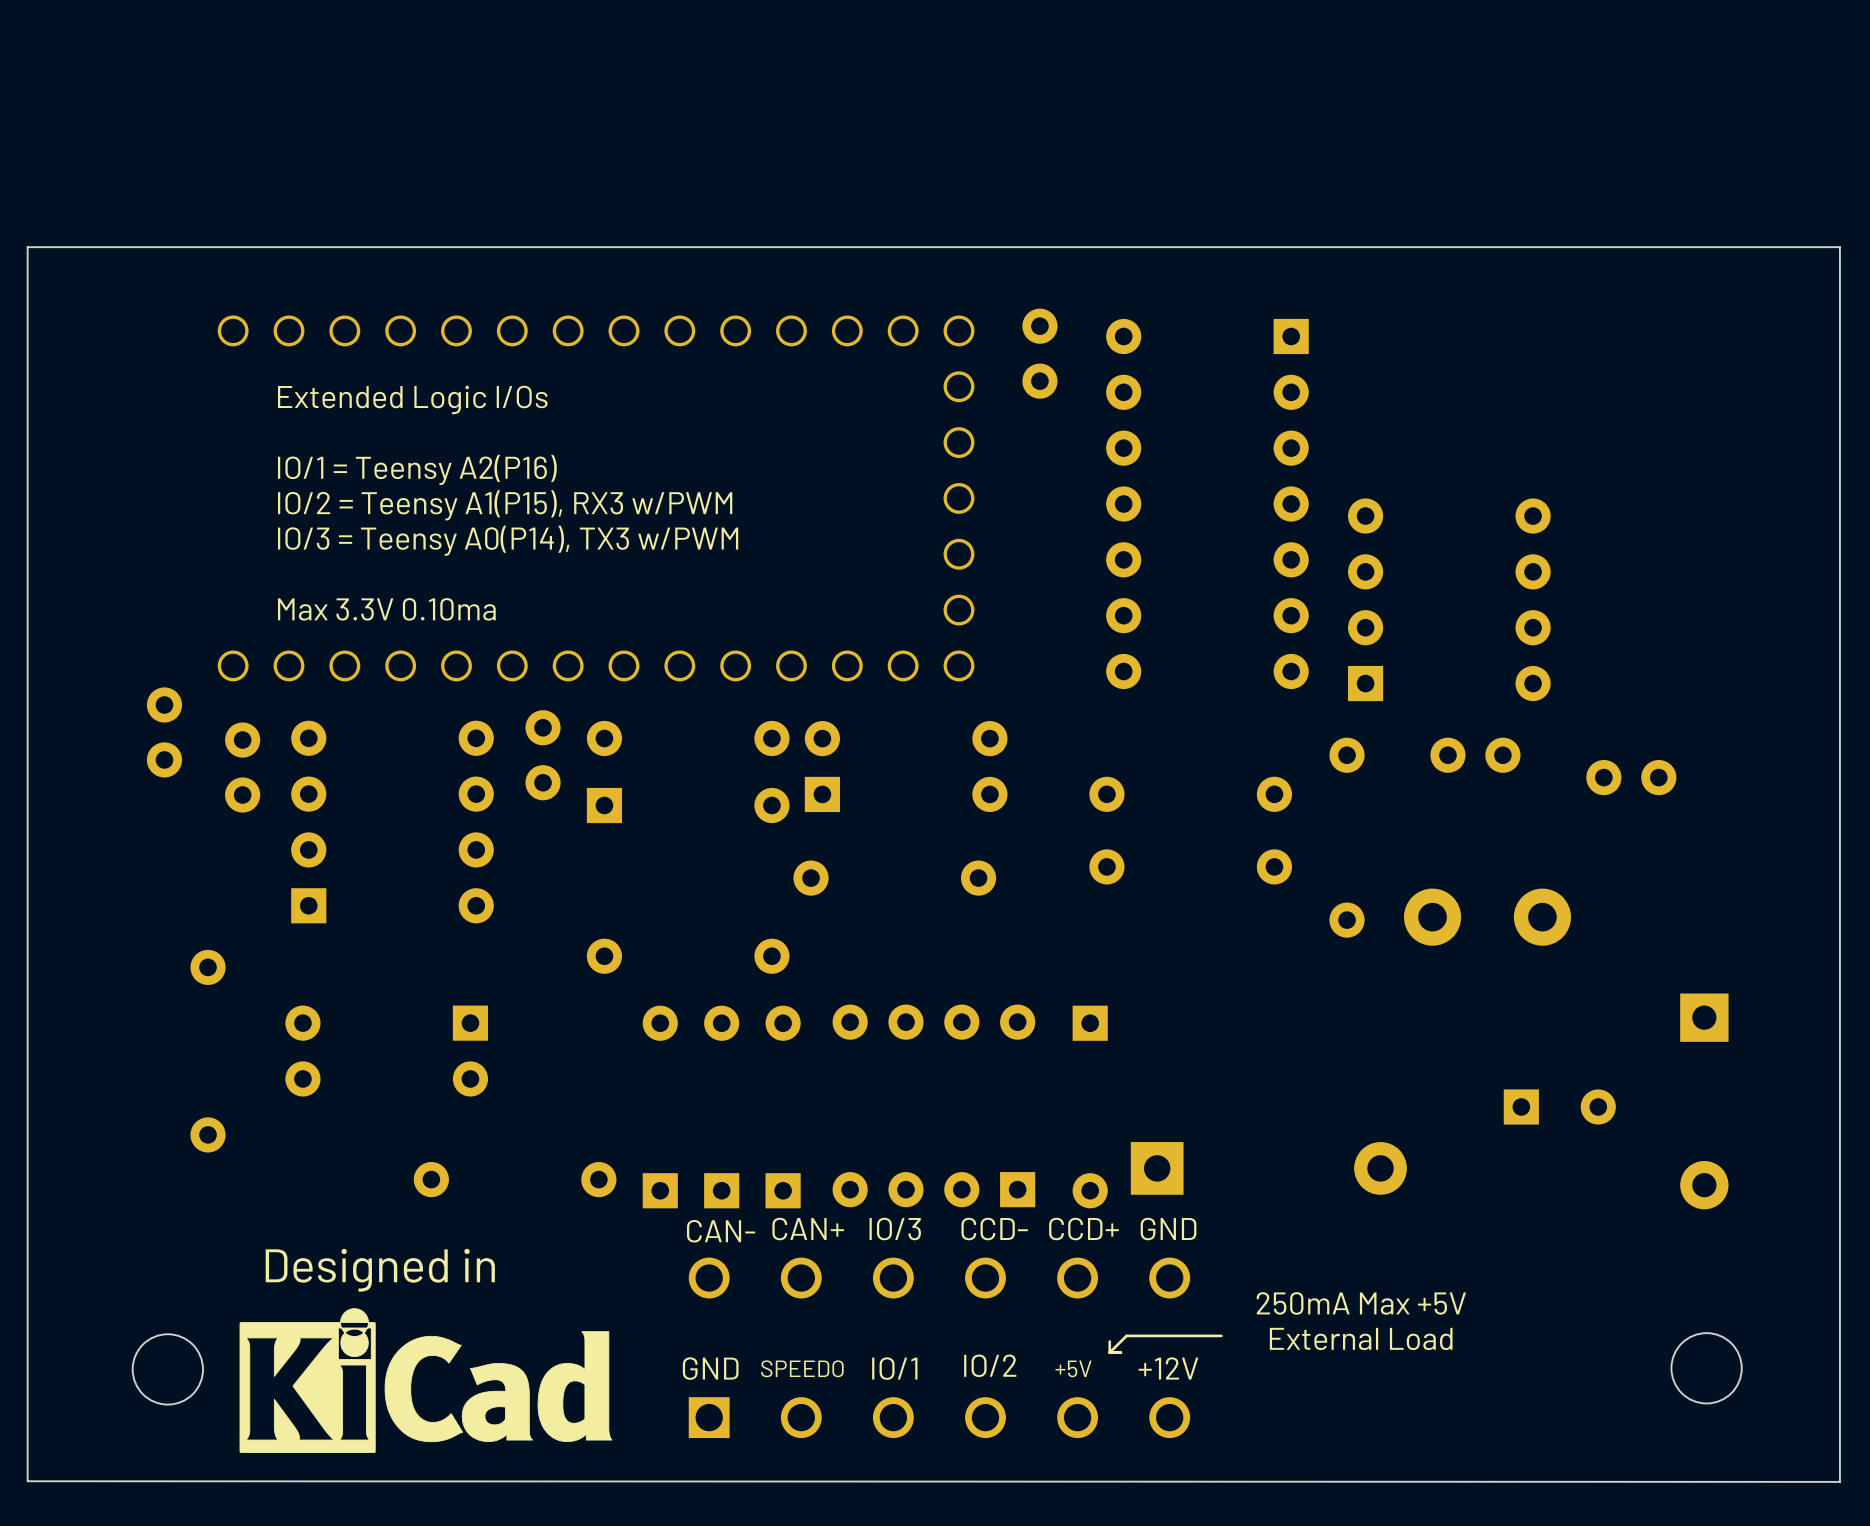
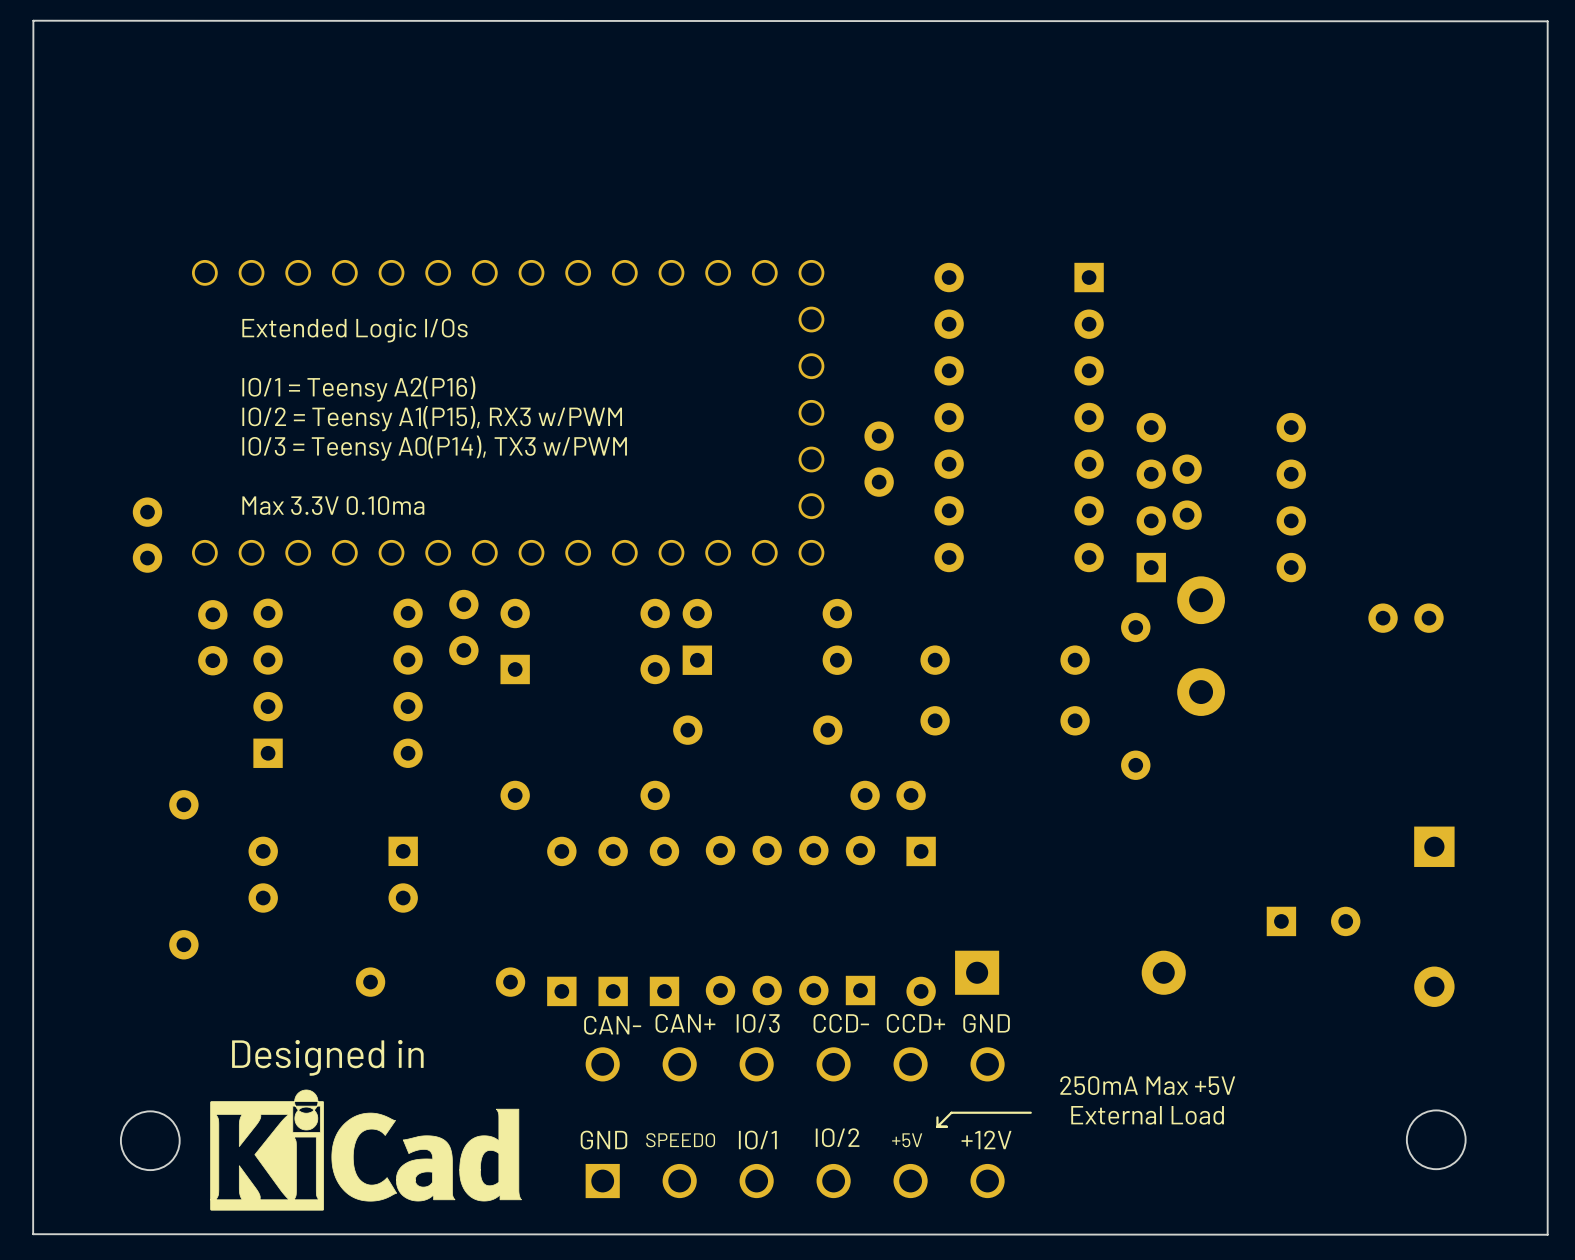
board edge: (1839, 247) (27, 247) (27, 1481) -> (1547, 202) (1547, 21) (33, 20) (33, 1234)
part position: (1039, 353) -> (879, 459)
part: none -> (1187, 492)
part position: (164, 732) -> (147, 535)
part: (1475, 755) -> none
part position: (1631, 777) -> (1406, 618)
part rotation: 0° (1487, 917) -> 90° clockwise (1201, 646)
part position: (1487, 917) -> (1201, 646)
part: none -> (888, 795)

